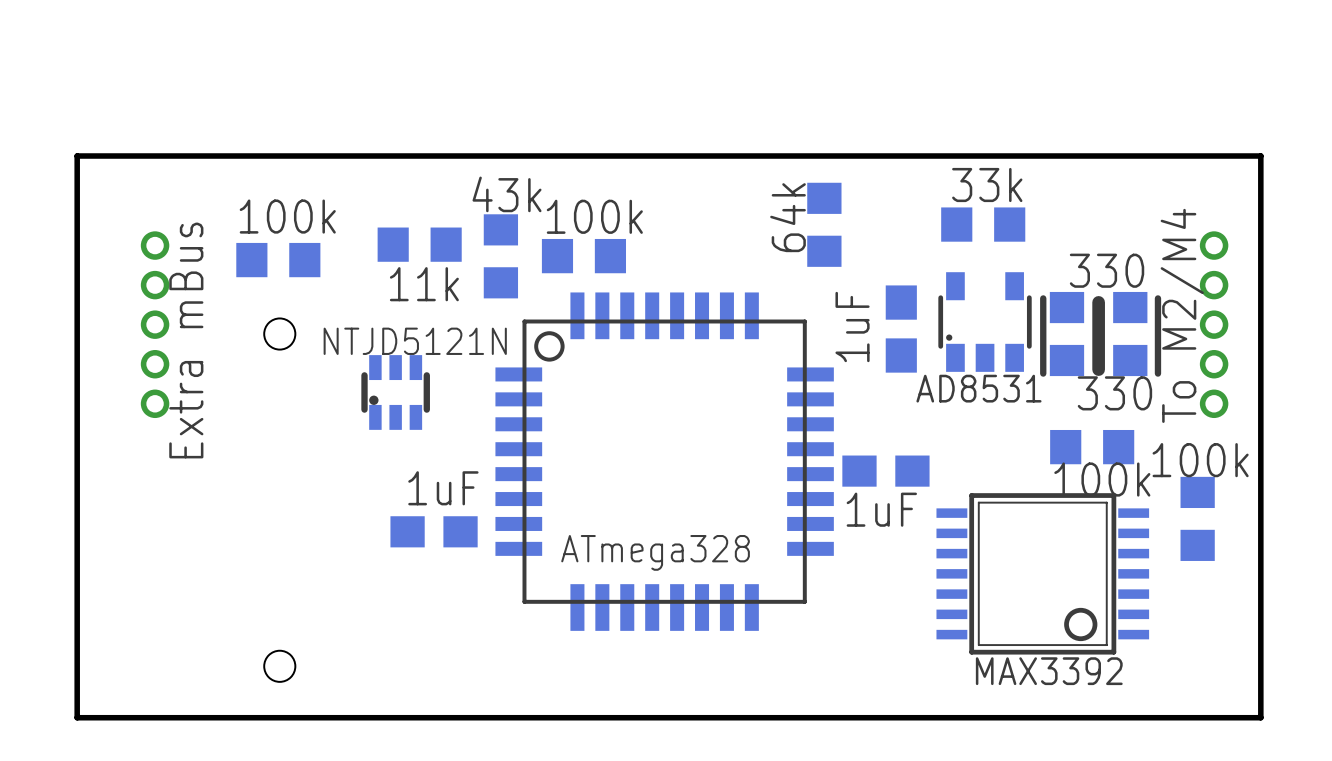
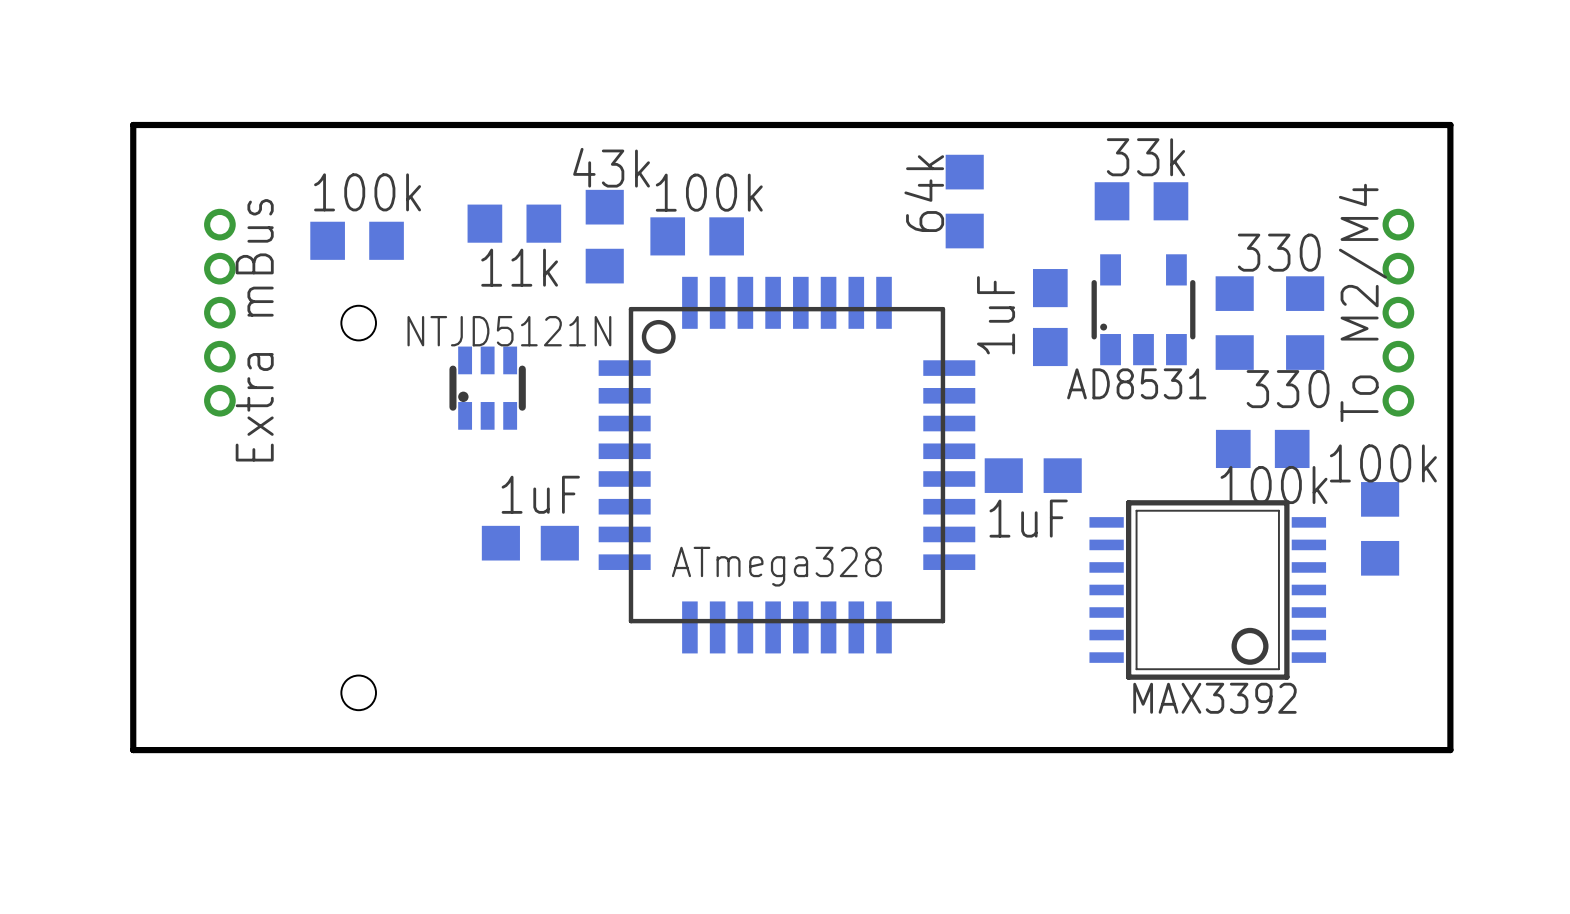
line: (1043, 298) (1043, 373) -> none
line: (1157, 298) (1157, 373) -> none
line: (1098, 302) (1098, 369) -> none

